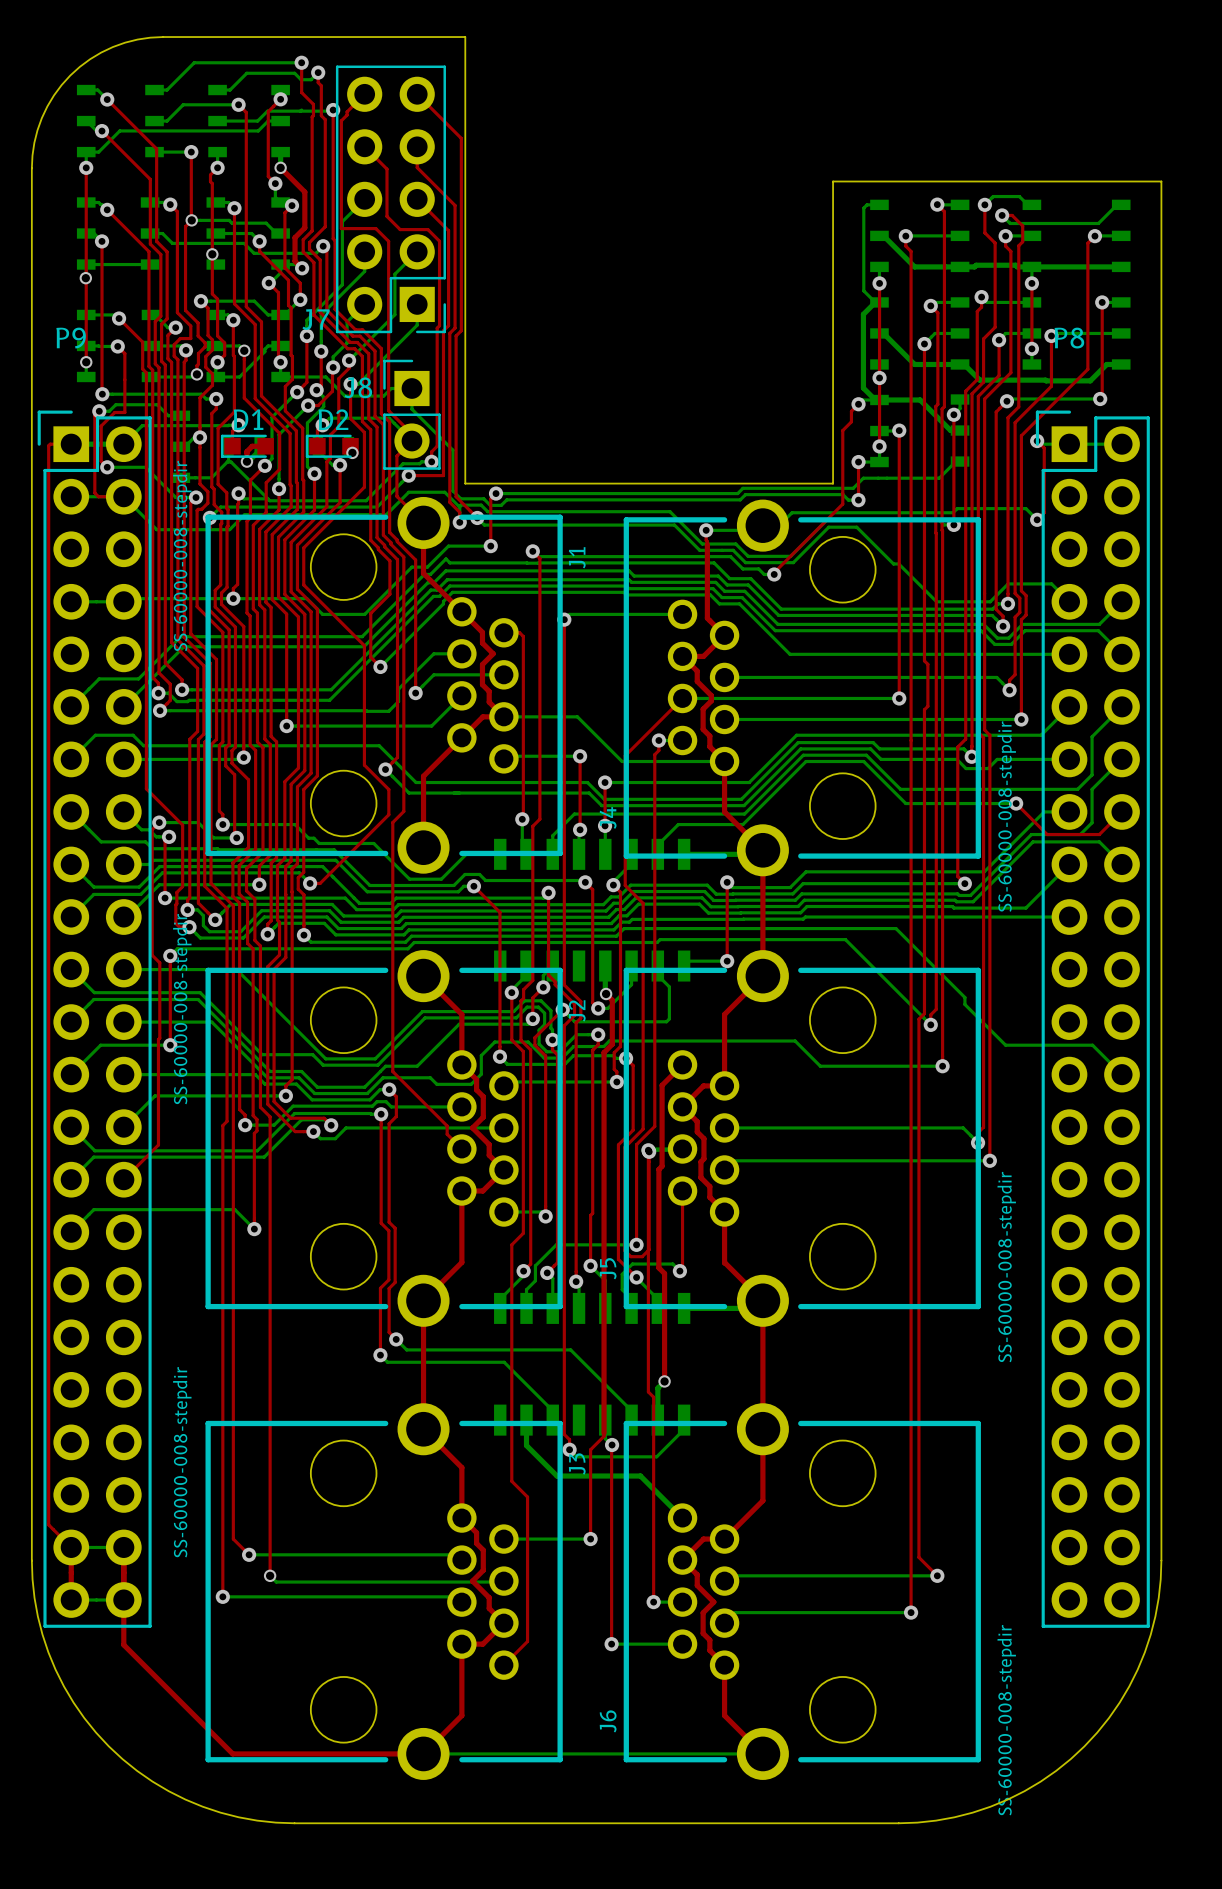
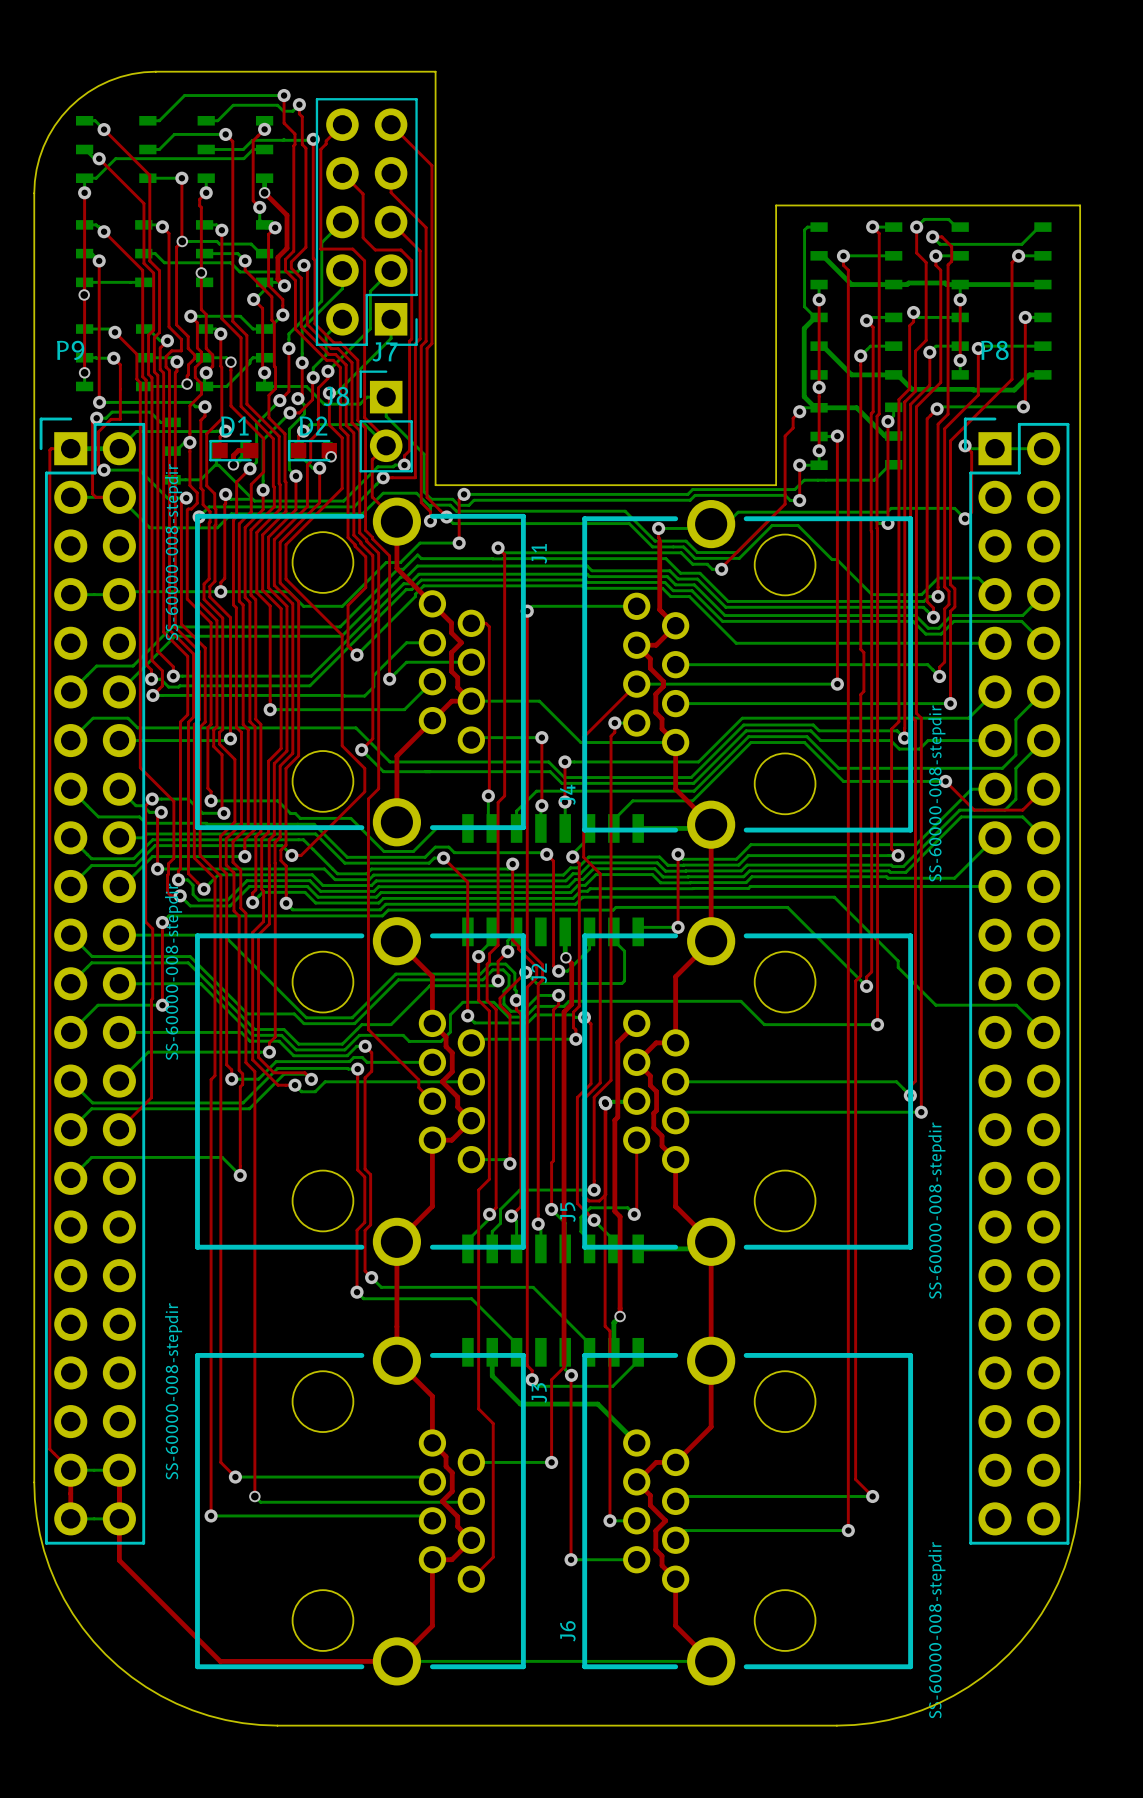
J7 name position: J7 (316, 319) -> J7 (384, 351)

